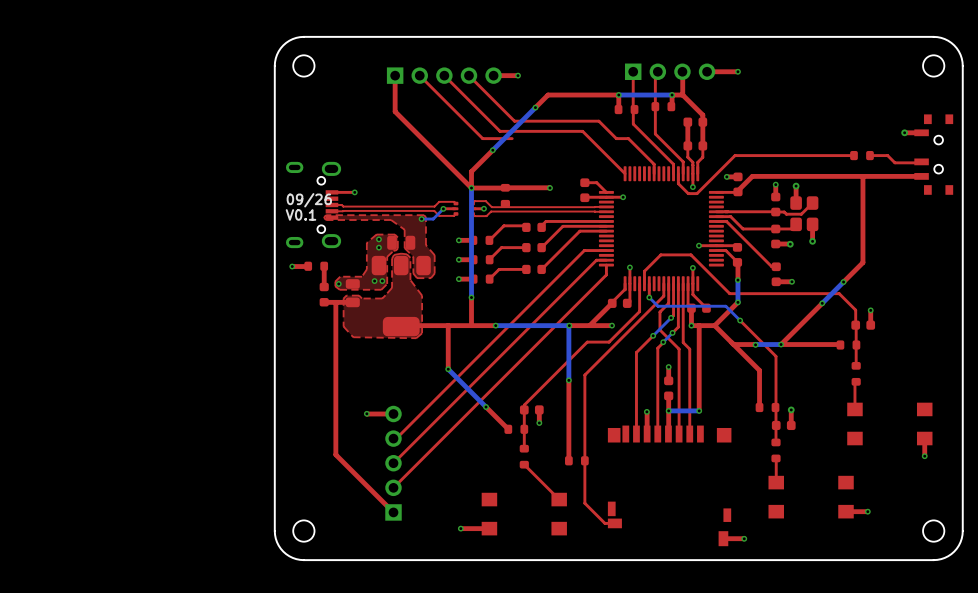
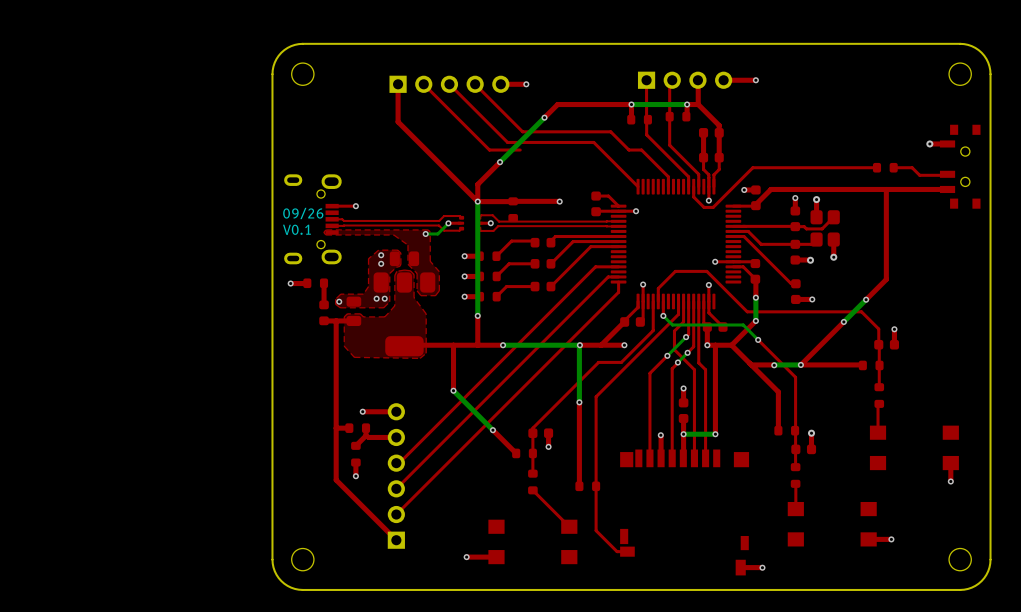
via: none -> (362, 411)
top track: none -> (396, 411) (362, 411)
top track: none -> (349, 428) (336, 428)
part: none -> (357, 428)
top track: none -> (366, 428) (366, 435) (355, 445)
via: (366, 413) -> none
part: none -> (355, 454)
top track: none -> (355, 462) (355, 476)
part: none -> (396, 475)
via: none -> (355, 476)

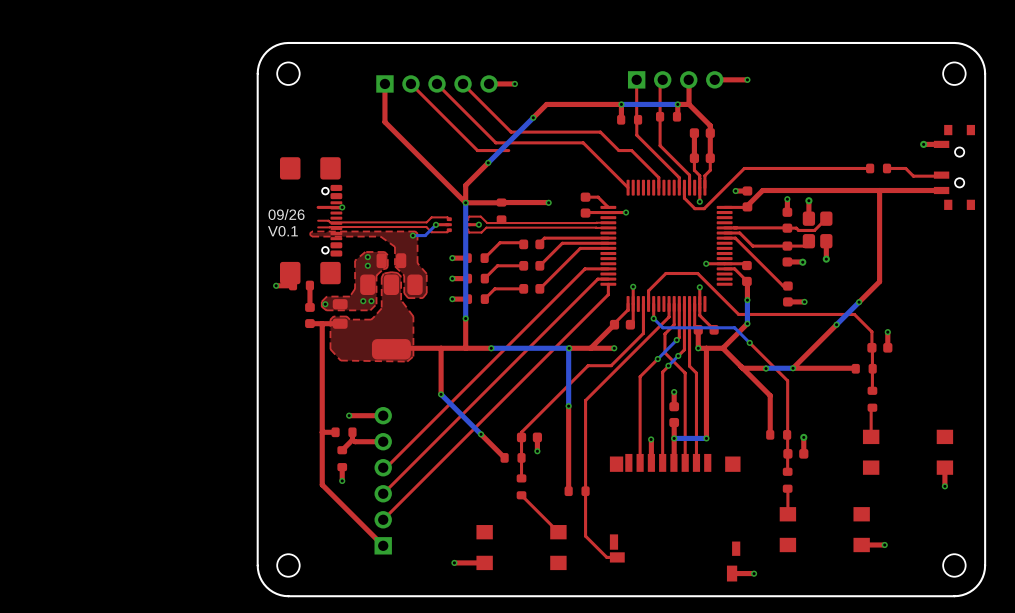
part: (312, 219) -> none
part: none -> (311, 220)

